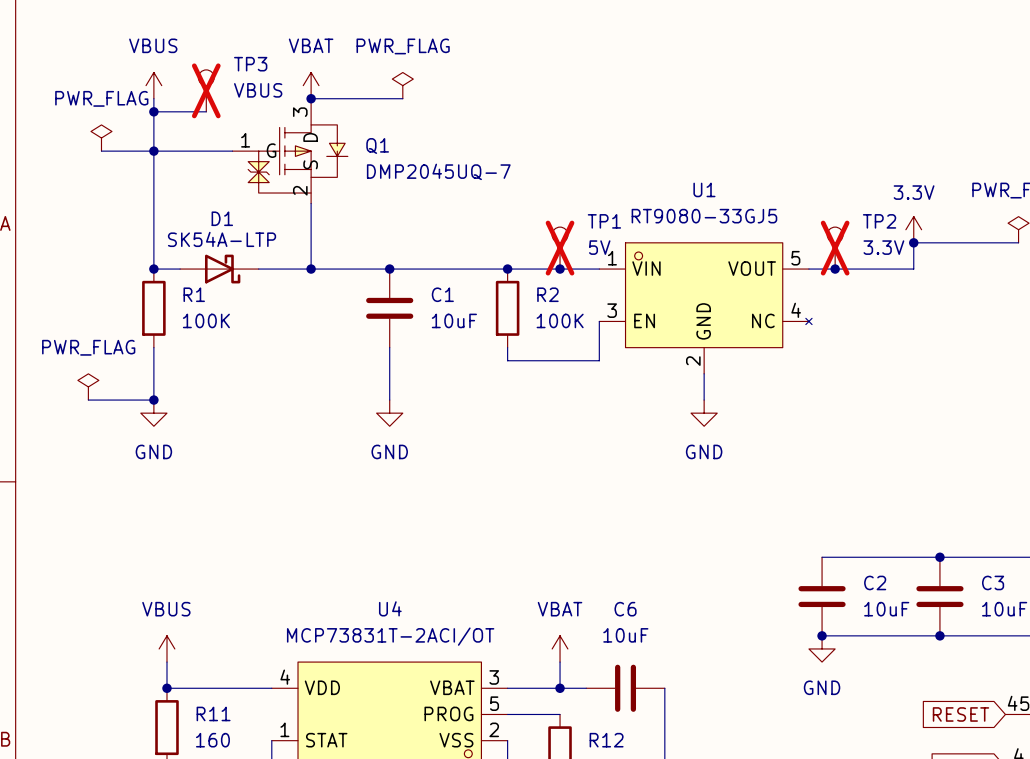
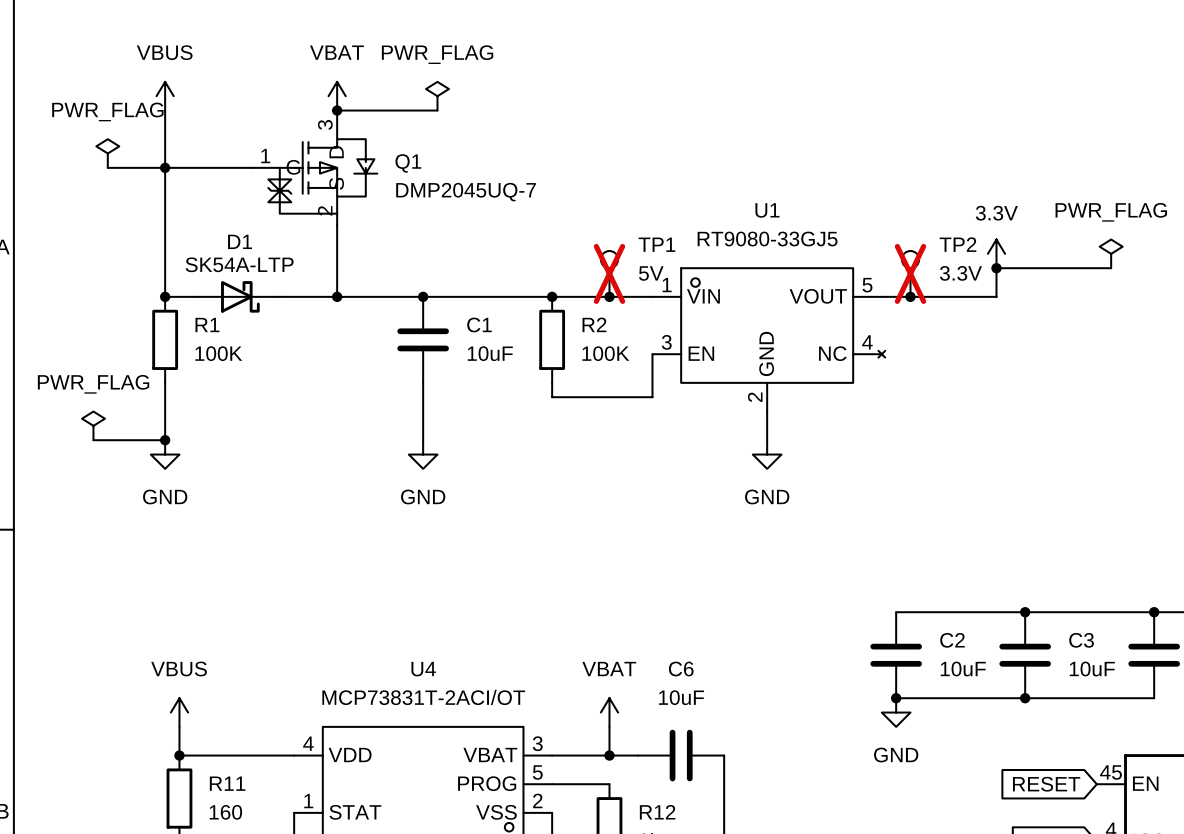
TP3: VBUS (206, 90) -> none
wire: (153, 111) (206, 111) -> none
junction: (153, 111) -> none

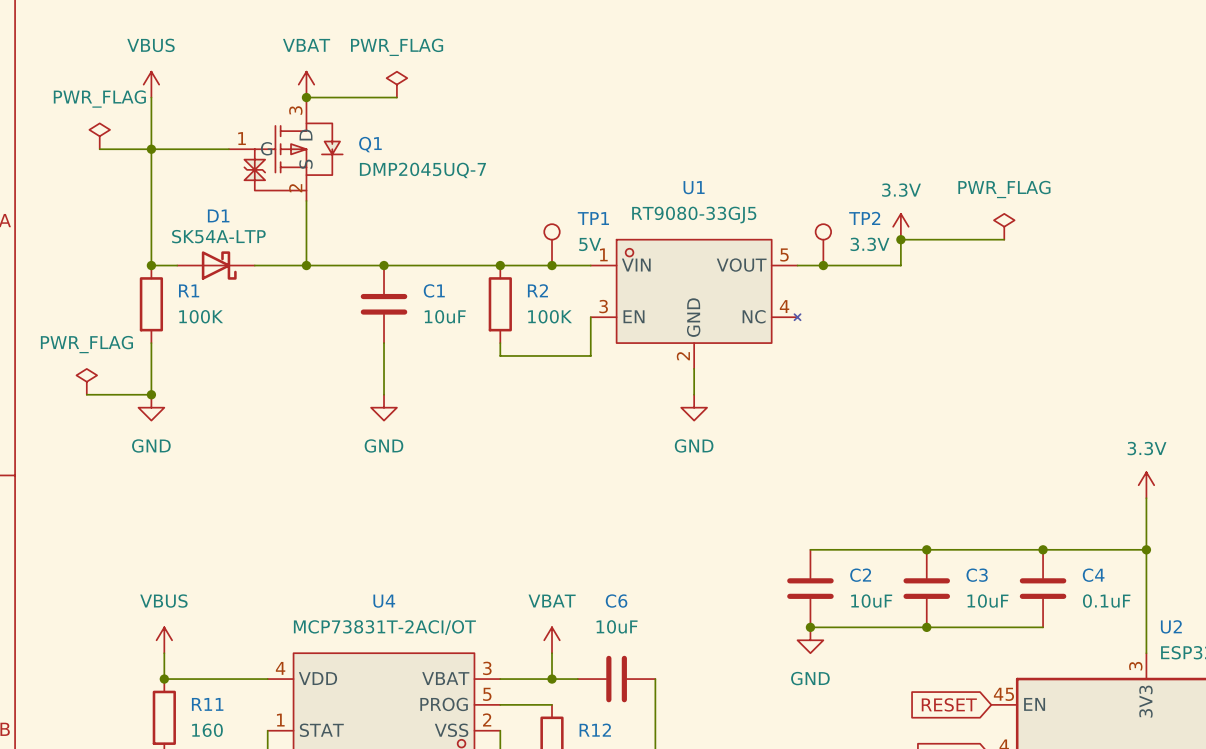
TP1 do-not-place cross: (609, 273) -> none
TP2 do-not-place cross: (910, 273) -> none

